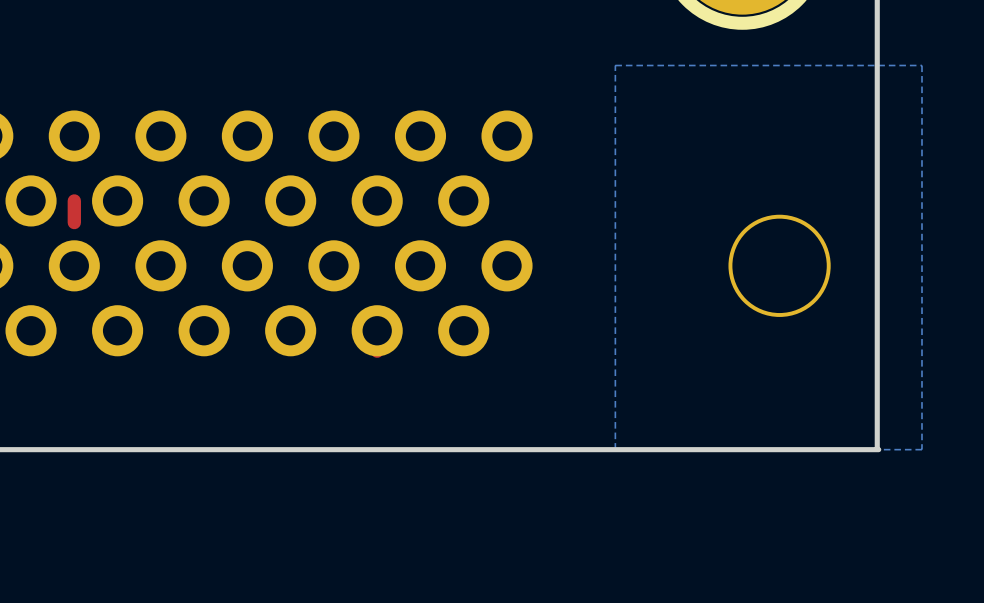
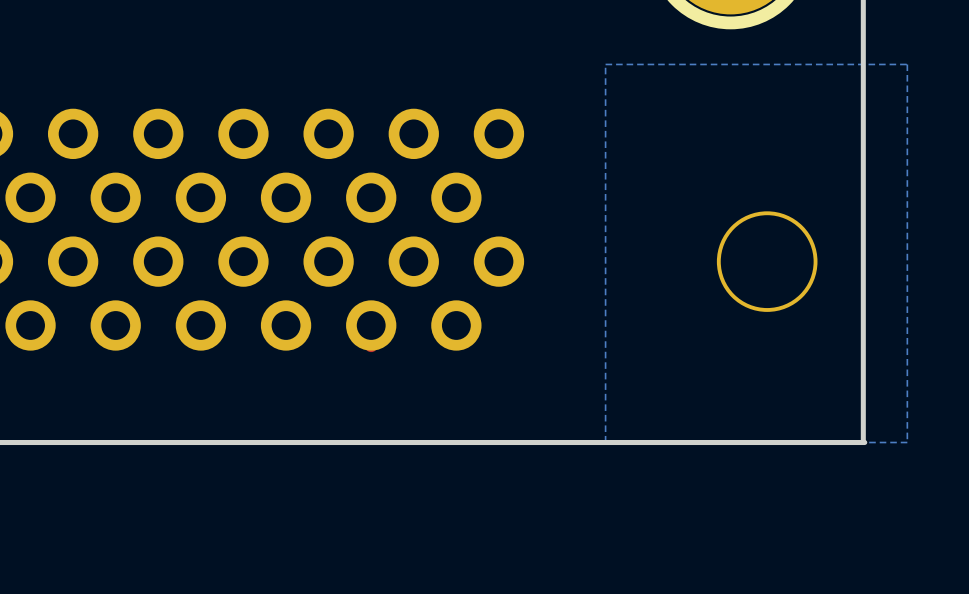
top track: (74, 200) (74, 222) (74, 200) -> none

